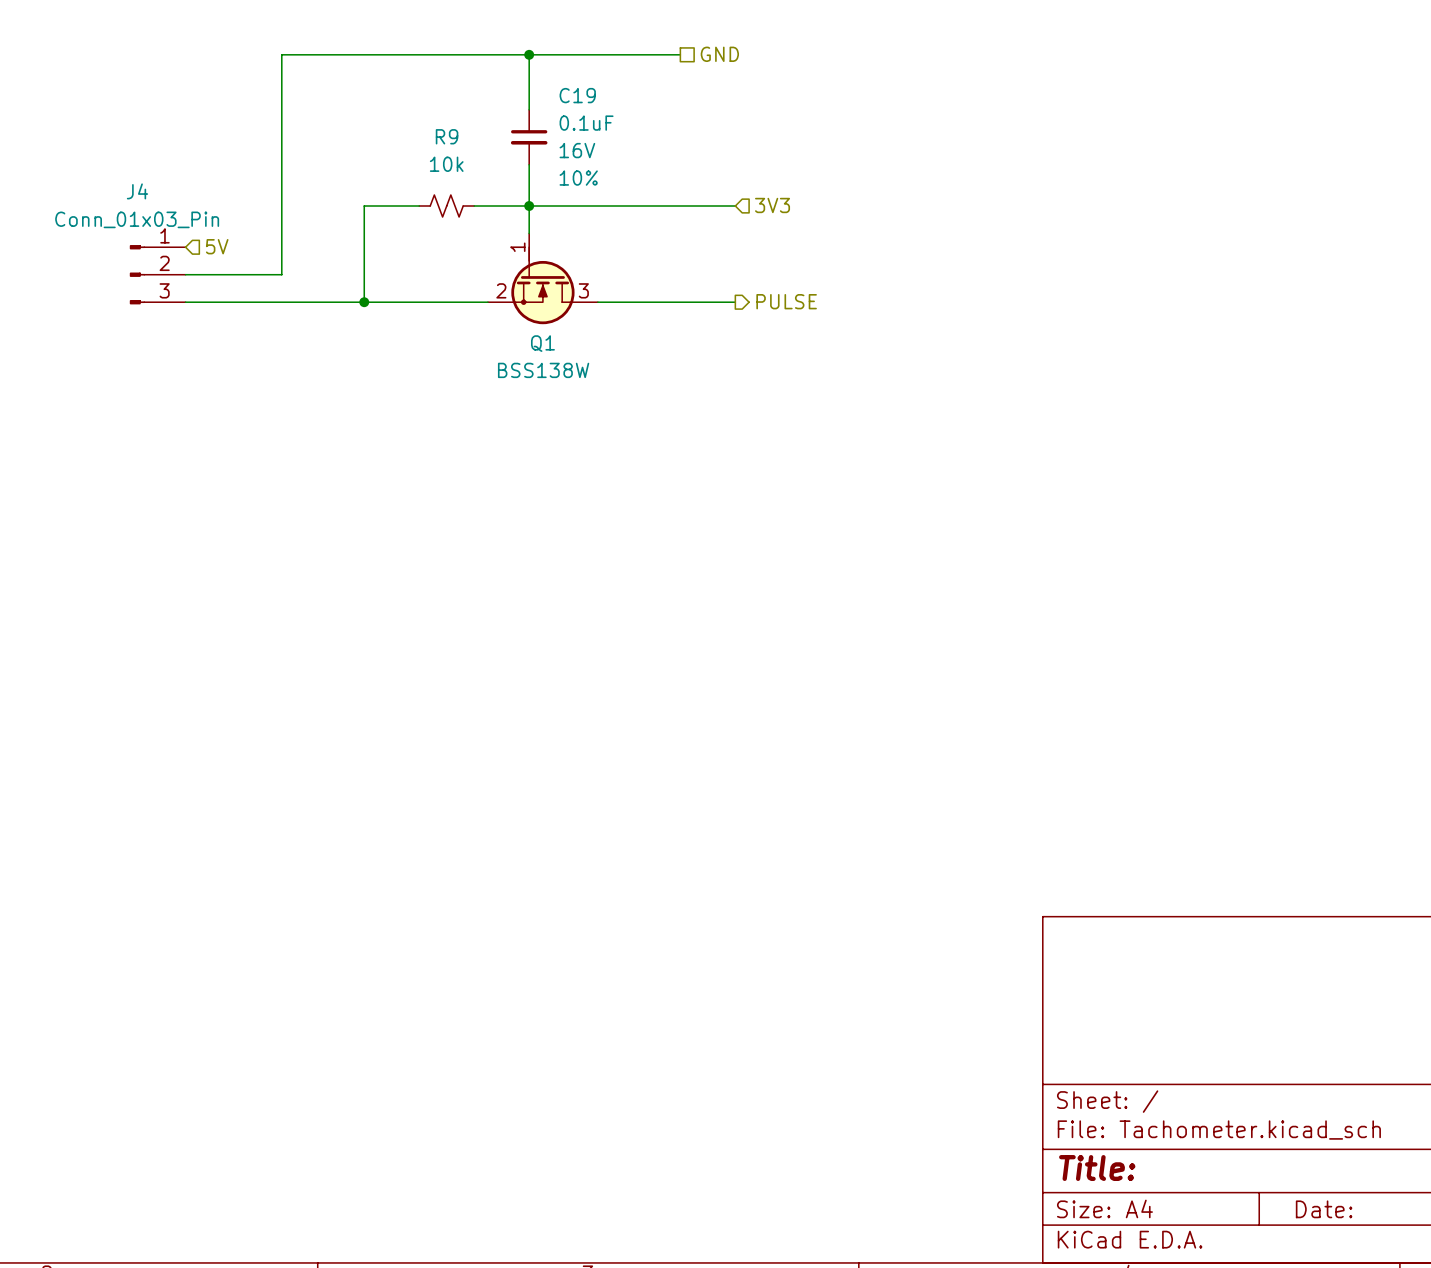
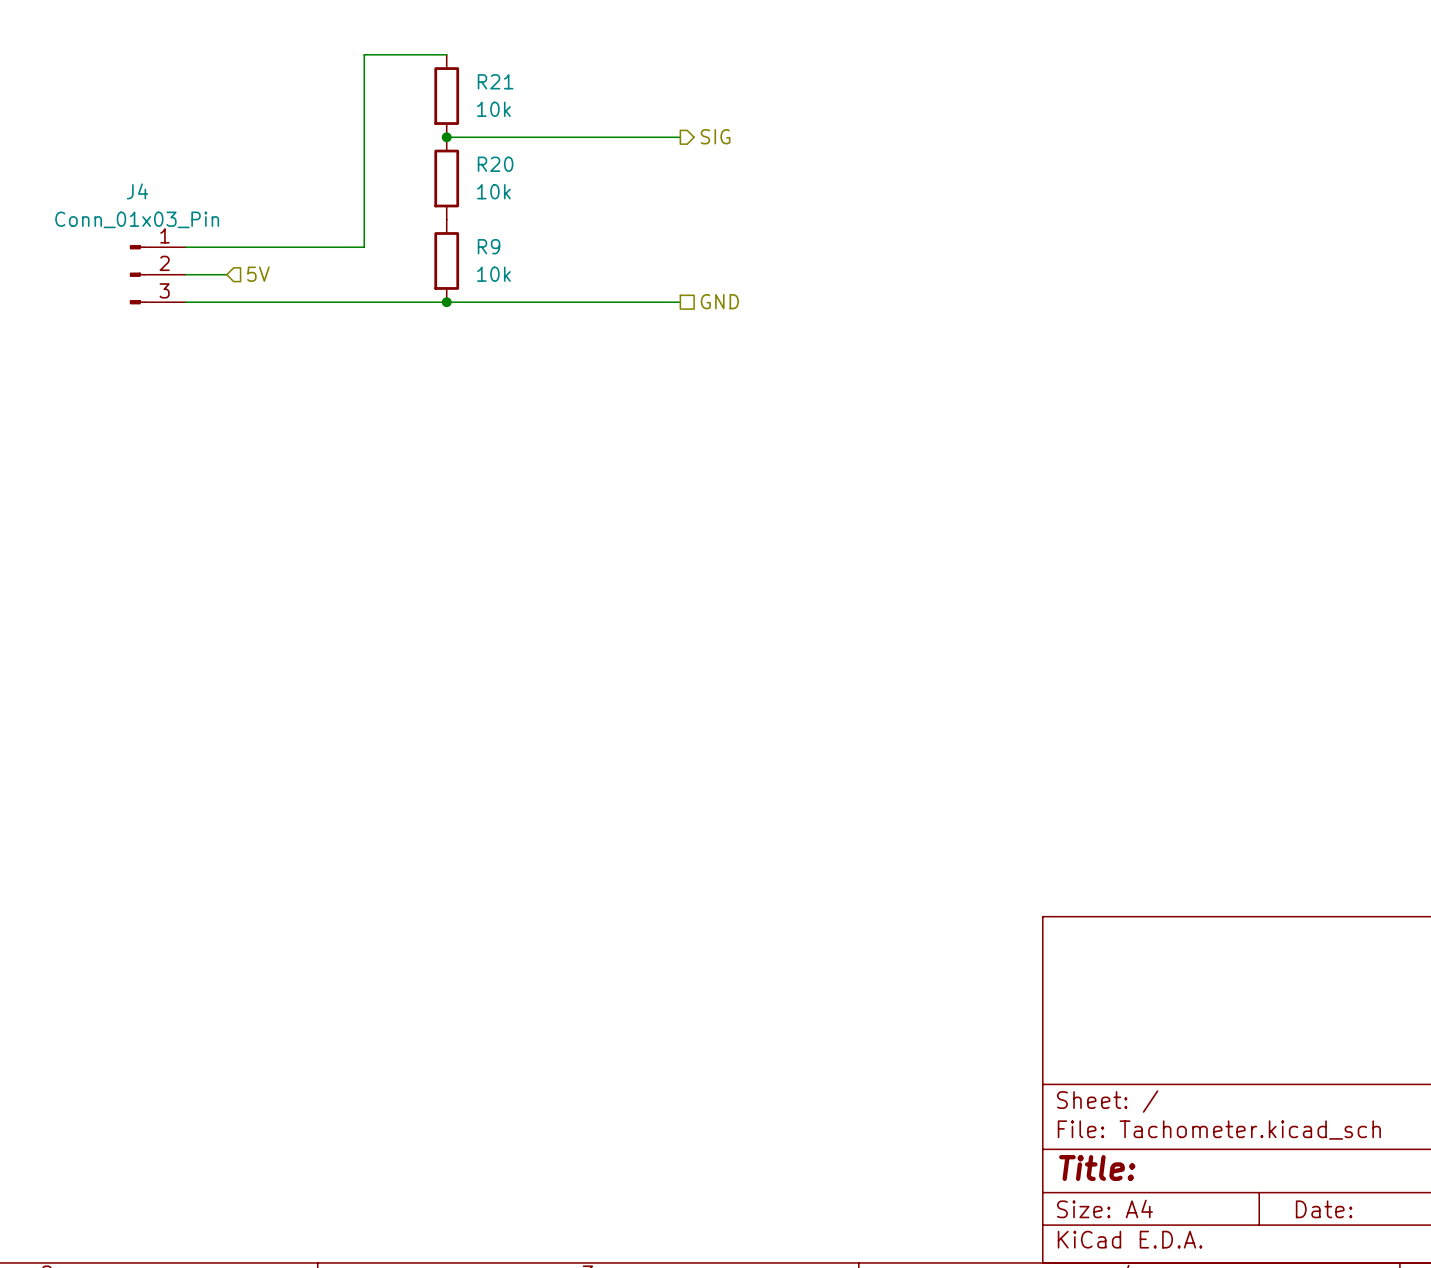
wire: (364, 54) (281, 54) (281, 274) (226, 274) -> (364, 54) (364, 206)
wire: (446, 54) (680, 54) -> (446, 137) (680, 137)
wire: (529, 54) (529, 109) -> none
junction: (529, 54) -> none
hierarchical label position: GND (719, 54) -> GND (719, 301)
R21: none -> 10k (446, 96)
R9 name position: R9 (447, 136) -> R9 (489, 246)
hierarchical label: none -> SIG (715, 136)
junction: none -> (446, 137)
C19: 0.1uF (529, 137) -> none
R9 value position: 10k (446, 164) -> 10k (493, 274)
wire: (529, 164) (529, 233) -> none
R20: none -> 10k (446, 178)
R9 symbol: [419, 195, 475, 217] -> [434, 219, 460, 303]
hierarchical label: 3V3 (772, 205) -> none
wire: (364, 206) (419, 206) -> none
wire: (474, 206) (735, 206) -> none
junction: (529, 206) -> none
hierarchical label position: 5V (217, 246) -> 5V (258, 274)
wire: (364, 247) (364, 302) -> (364, 247) (185, 247)
Q1: BSS138W (542, 278) -> none
hierarchical label: PULSE (786, 301) -> none
junction: (364, 302) -> none
junction: none -> (446, 302)
wire: (680, 302) (735, 302) -> none

